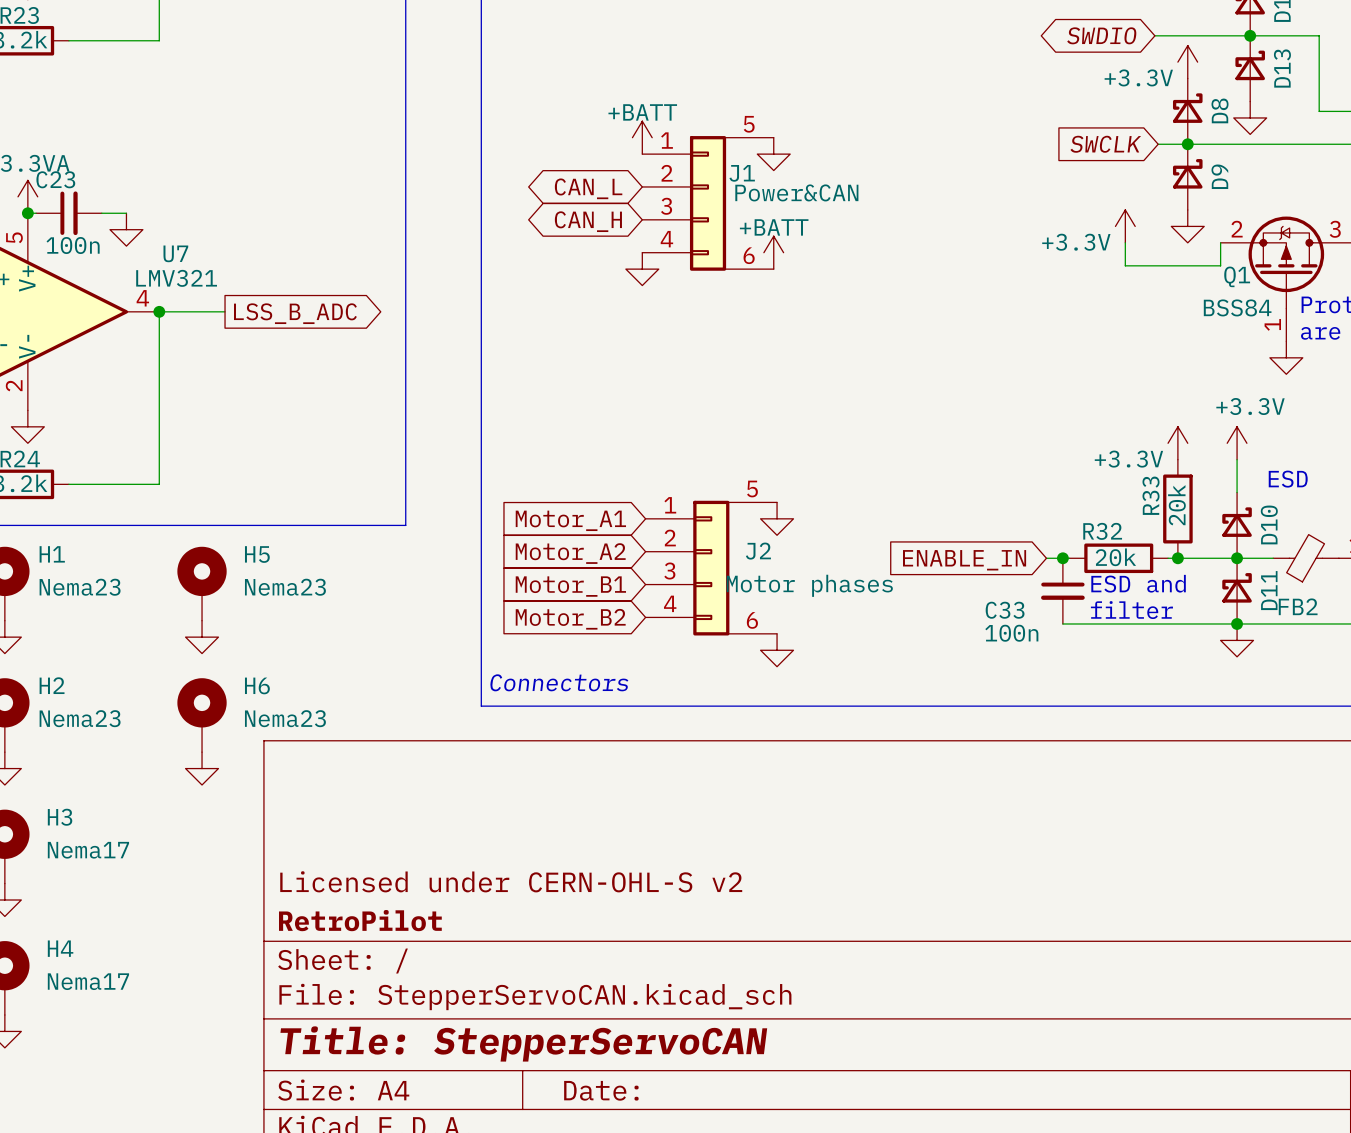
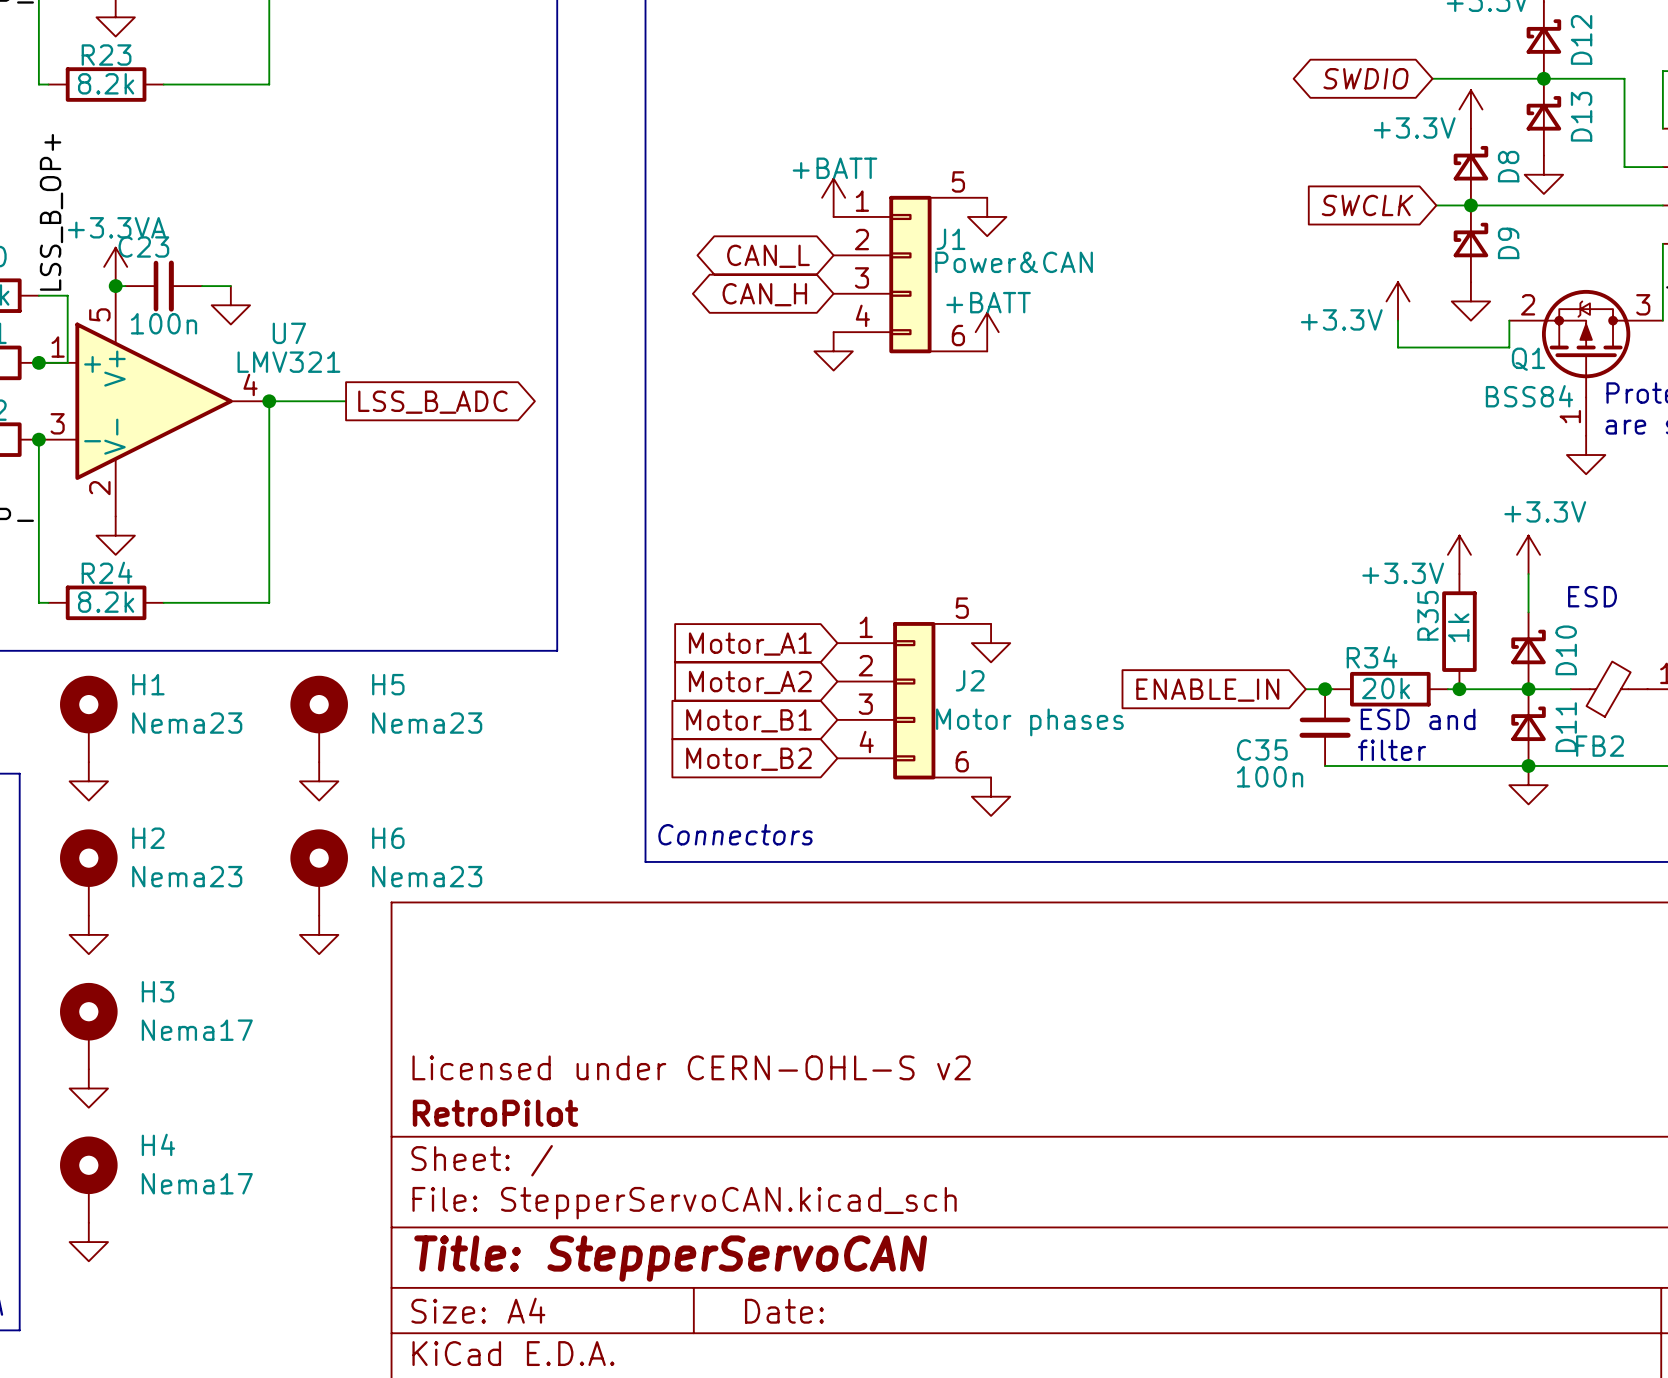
R33 name: R33 (1151, 495) -> R35 (1428, 615)
R33 value: 20k (1176, 505) -> 1k (1458, 627)
R32 name: R32 (1102, 531) -> R34 (1372, 657)
C33 name: C33 (1005, 610) -> C35 (1262, 749)

